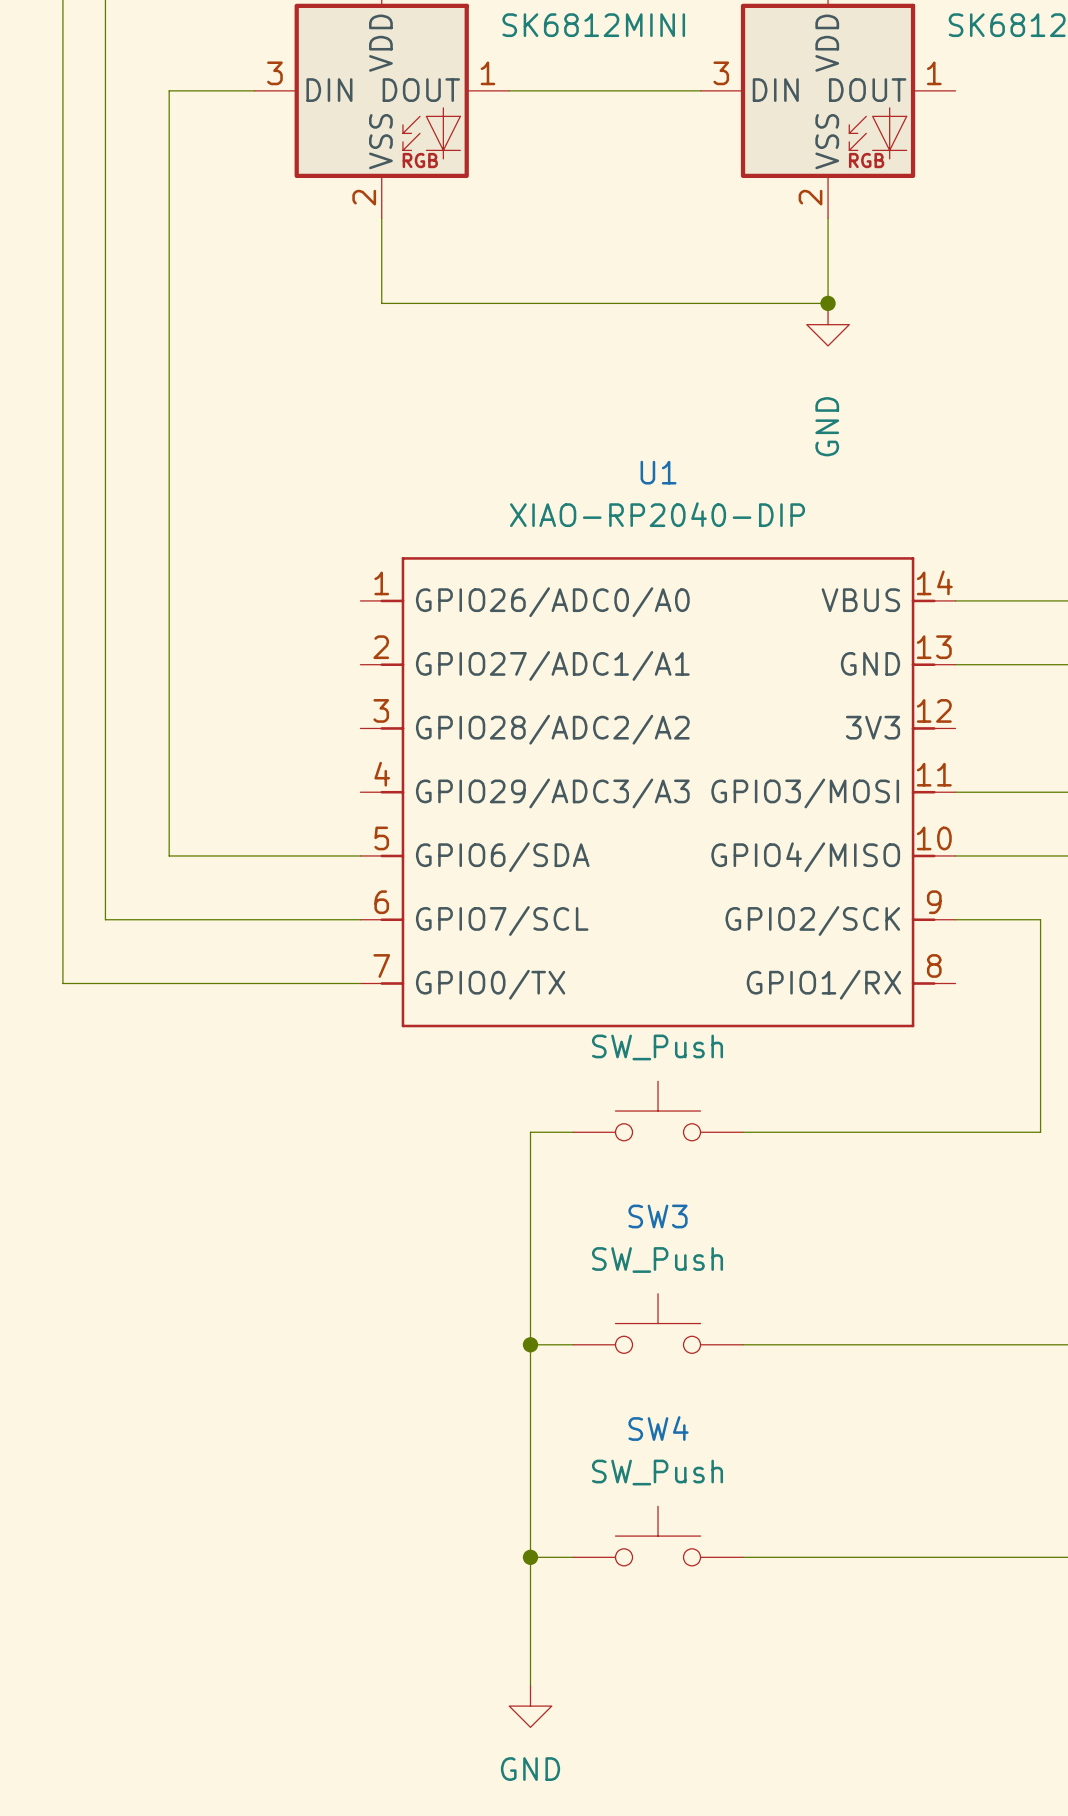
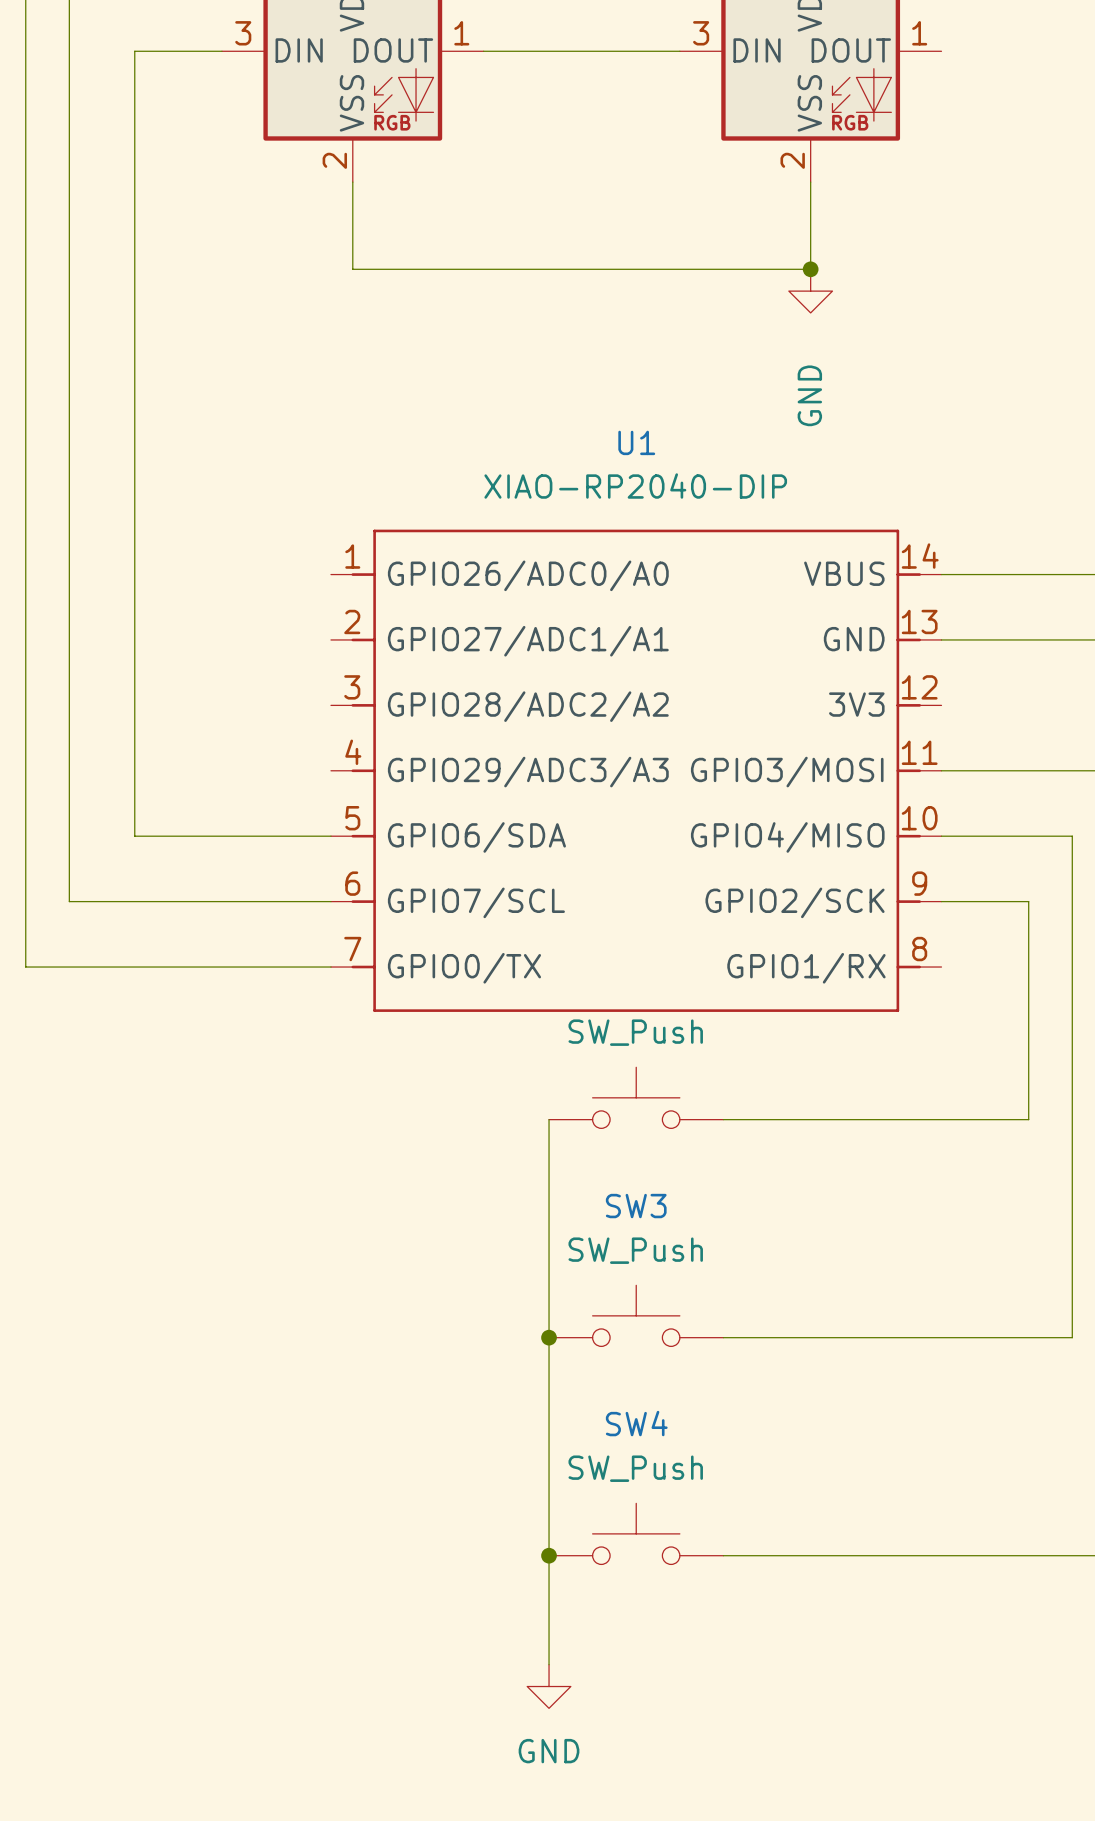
wire: (573, 1132) (530, 1132) (530, 1684) -> (549, 1119) (549, 1664)
wire: (530, 1344) (573, 1344) -> none
junction position: (530, 1344) -> (549, 1337)
wire: (530, 1557) (573, 1557) -> none
junction position: (530, 1557) -> (549, 1555)
power symbol position: GND (530, 1706) -> GND (549, 1686)

